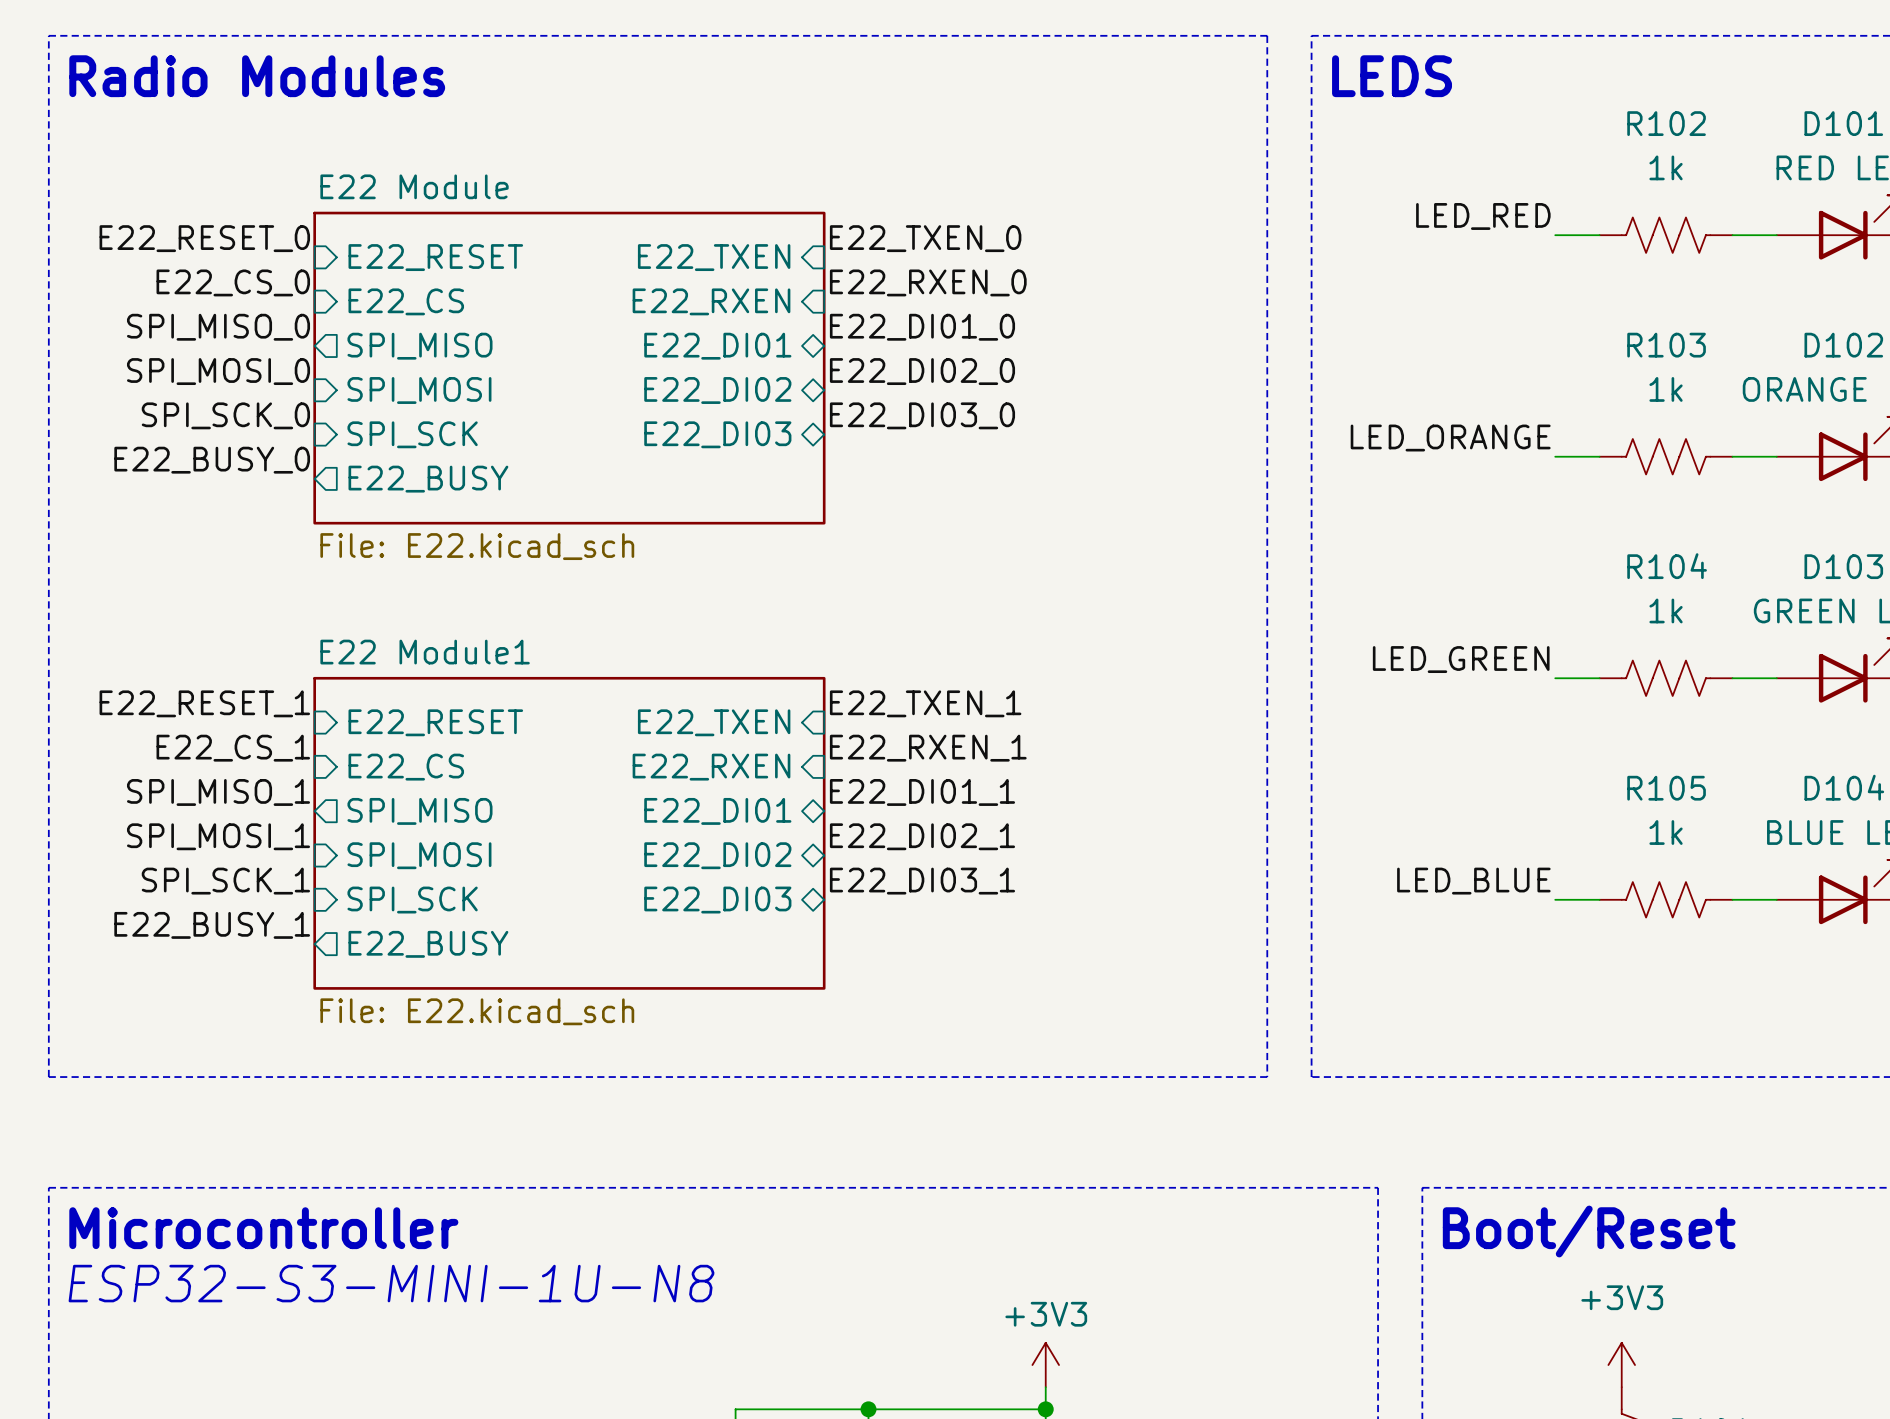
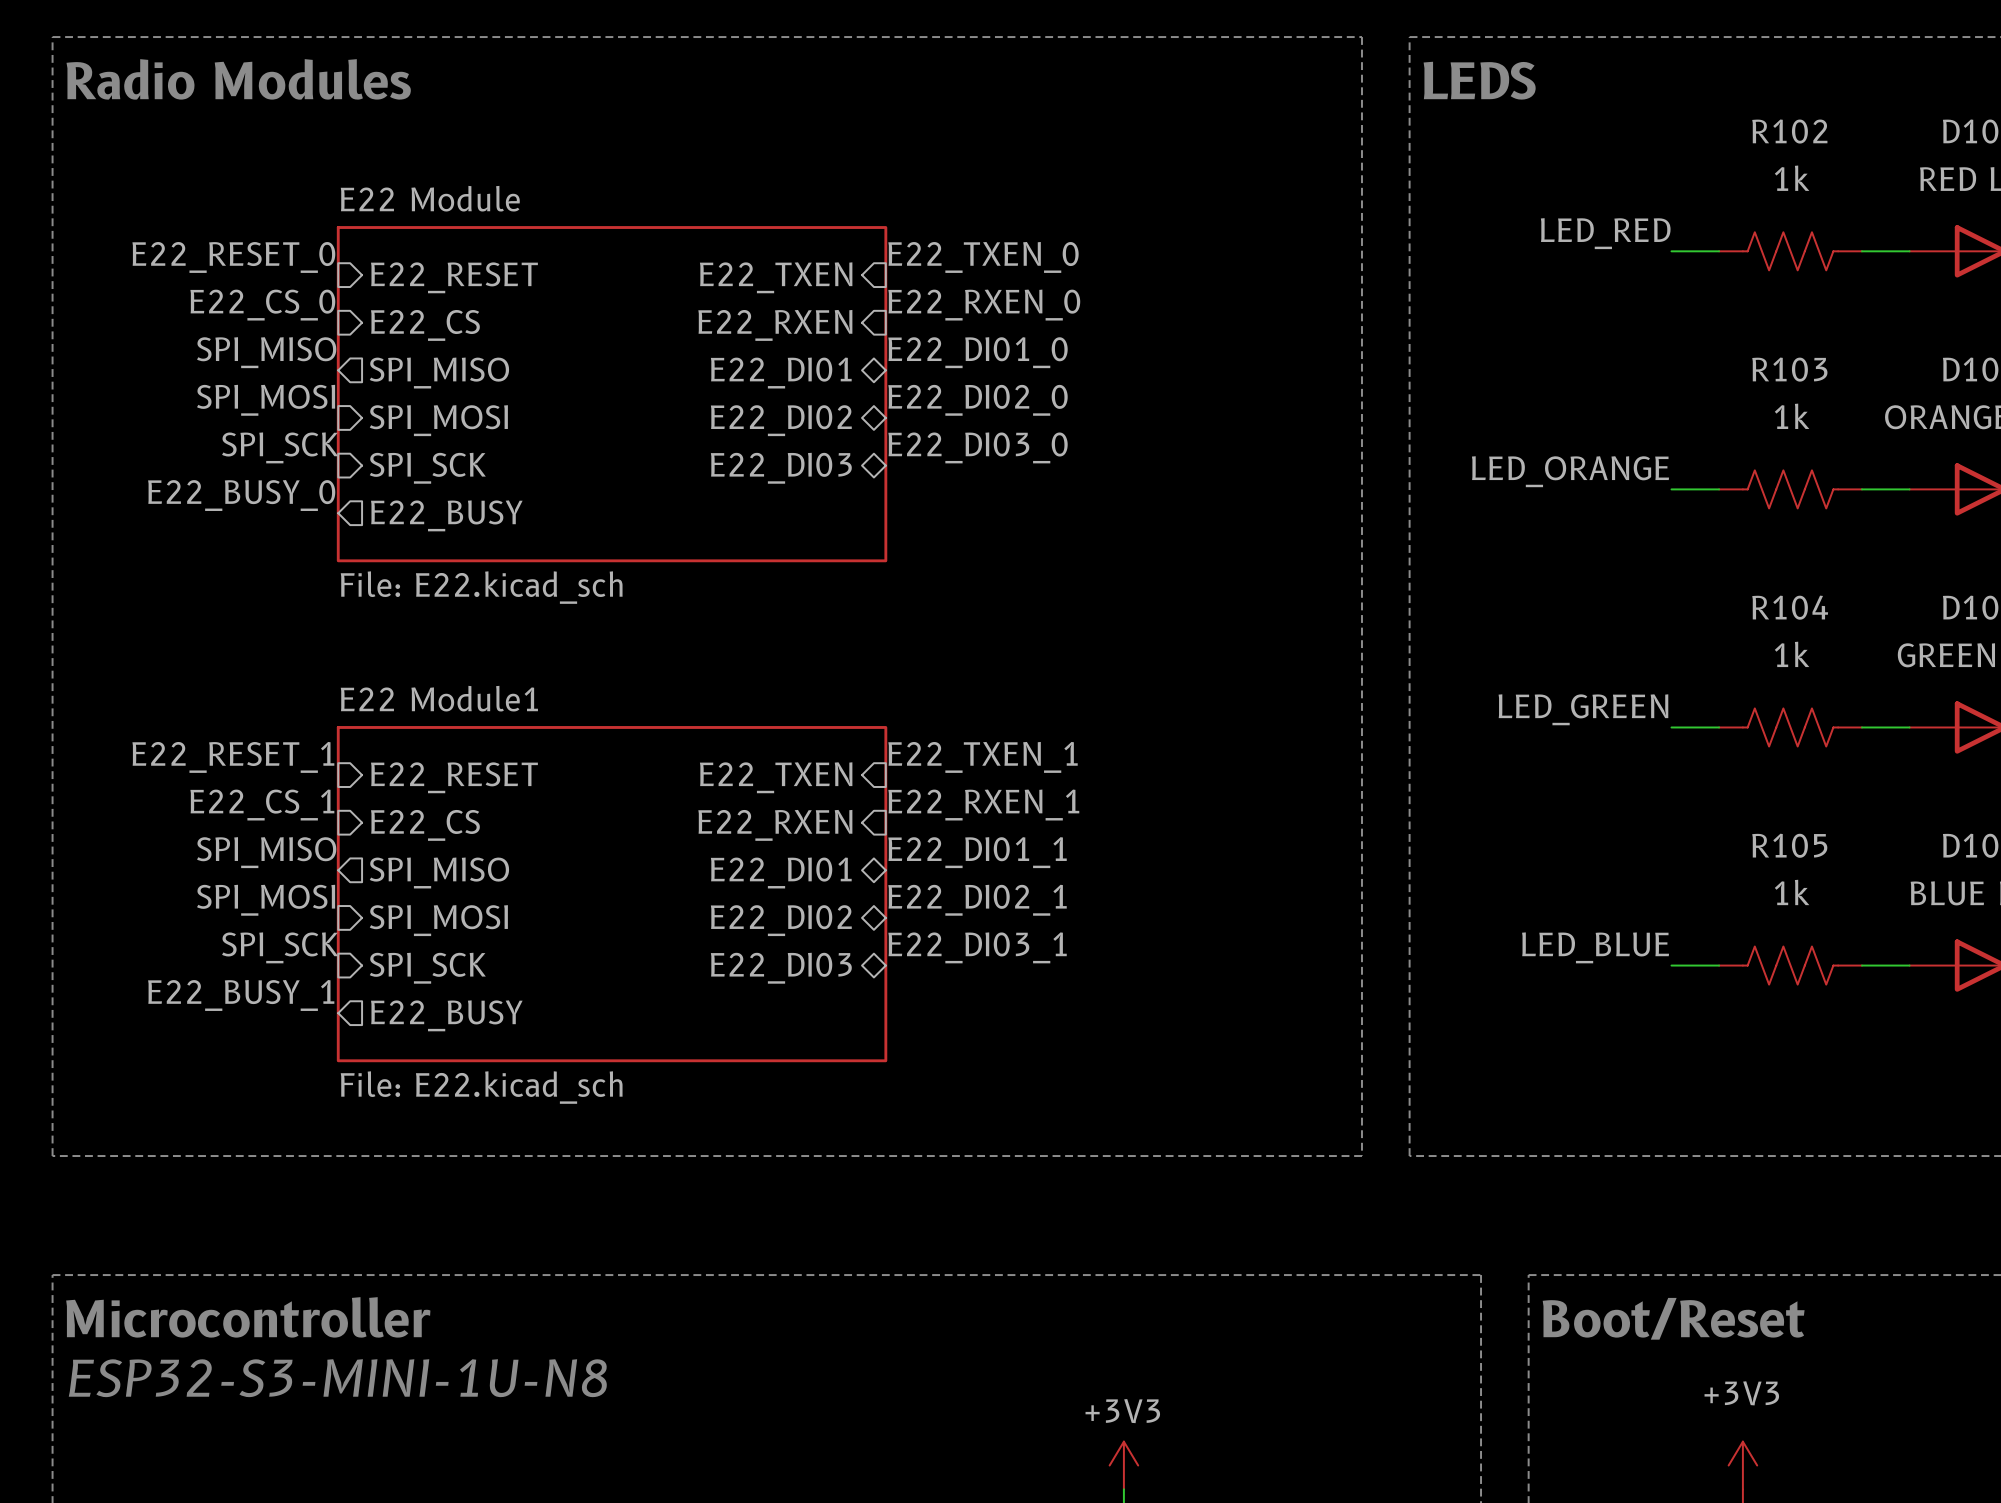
label: SPI_MISO_0 (218, 327) -> SPI_MISO (266, 352)
label: SPI_MOSI_0 (218, 371) -> SPI_MOSI (266, 400)
label: SPI_SCK_0 (225, 415) -> SPI_SCK (280, 447)
label: SPI_MISO_1 (218, 792) -> SPI_MISO (266, 852)
label: SPI_MOSI_1 (218, 836) -> SPI_MOSI (266, 900)
label: SPI_SCK_1 (225, 881) -> SPI_SCK (280, 947)

